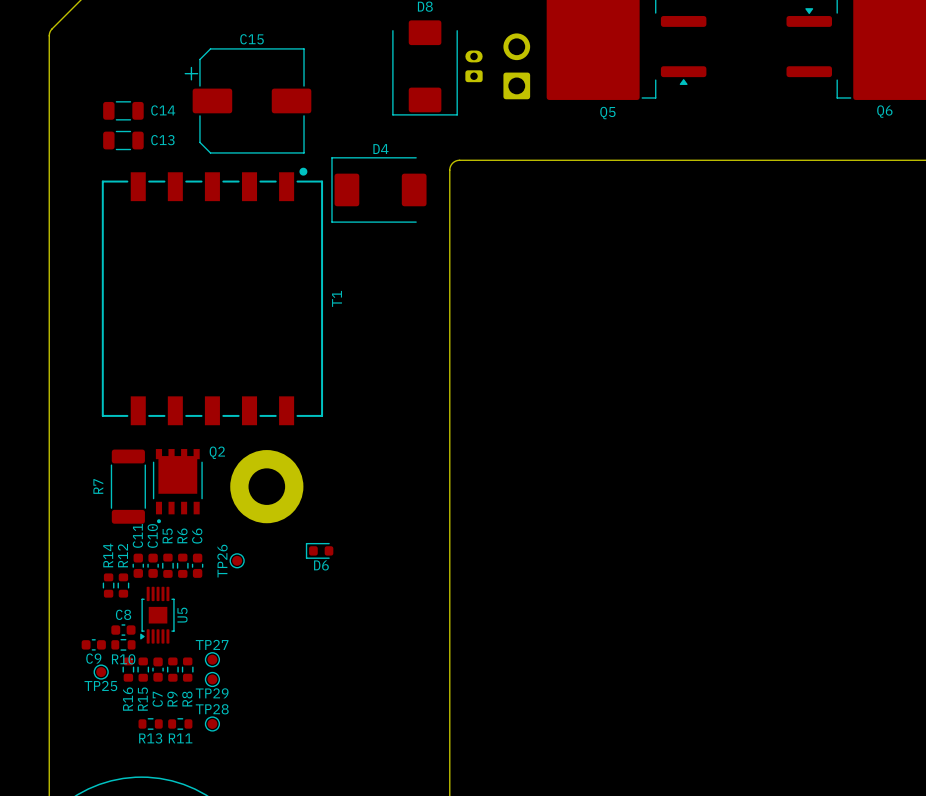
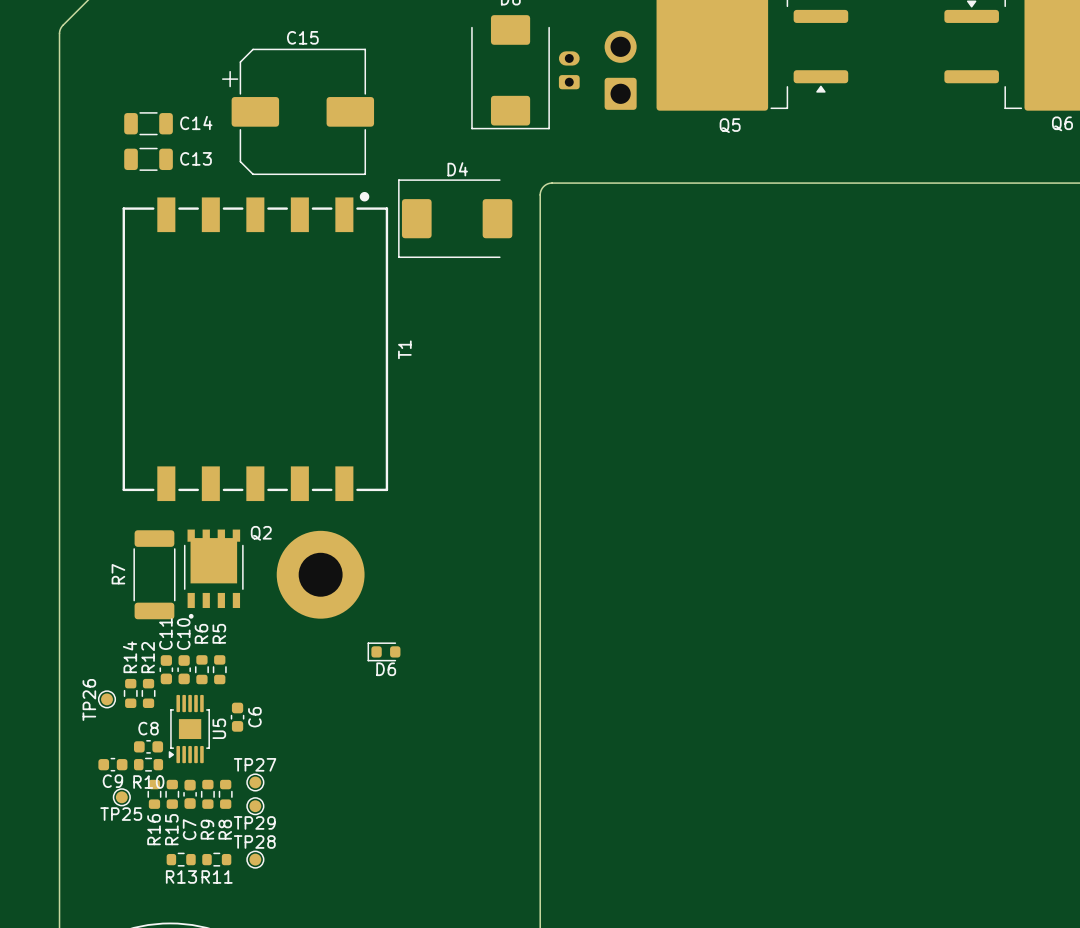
R5 name: R5 (167, 535) -> R6 (201, 633)
R6 name: R6 (182, 535) -> R5 (219, 633)
C6 name position: C6 (197, 536) -> C6 (254, 717)
TP26 position: (237, 560) -> (106, 699)
C6 position: (197, 565) -> (237, 717)

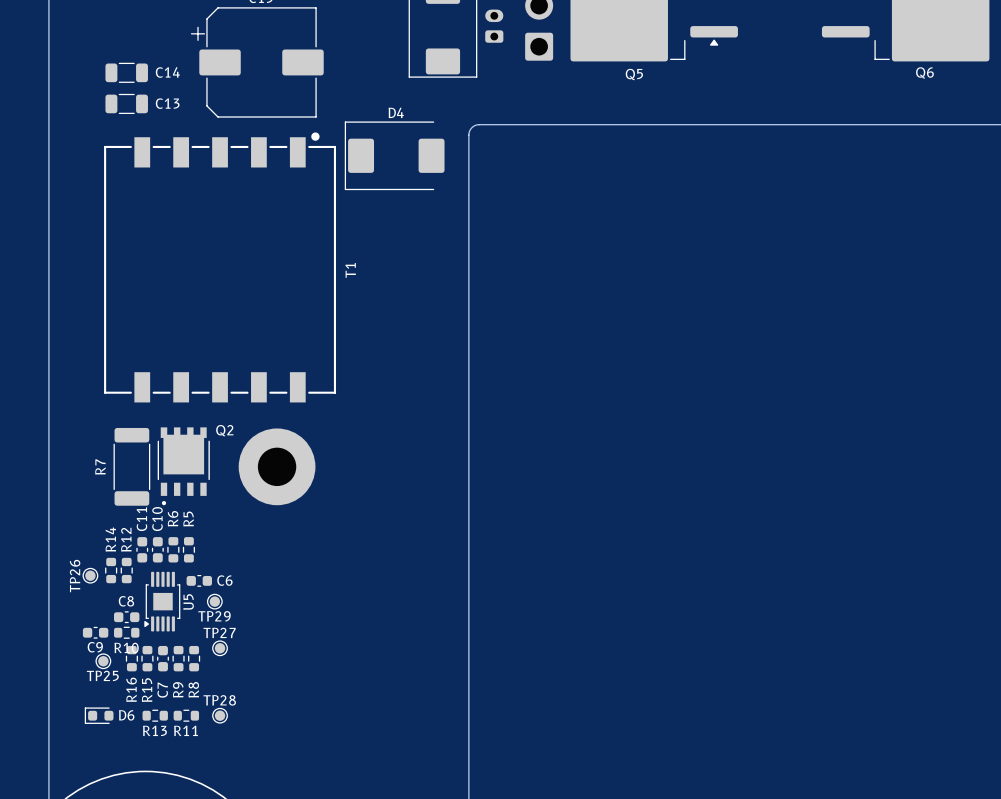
D6 position: (384, 651) -> (99, 715)
D6 name position: D6 (386, 669) -> D6 (126, 715)
C6 rotation: 0° (237, 717) -> 90° clockwise (199, 580)
TP29 position: (255, 806) -> (214, 601)

